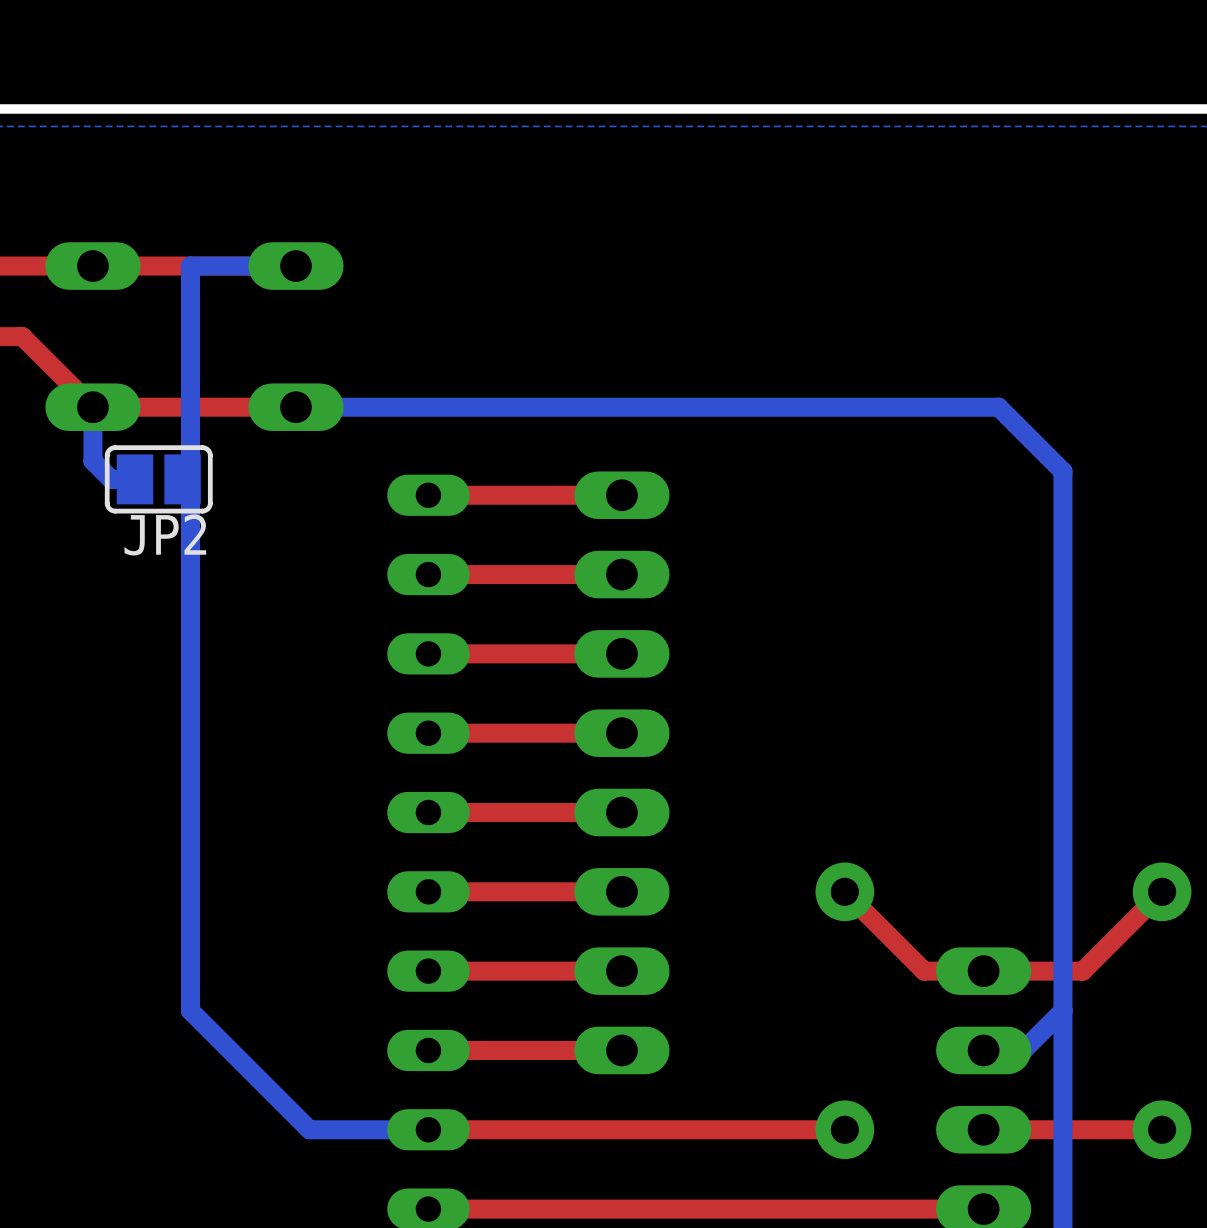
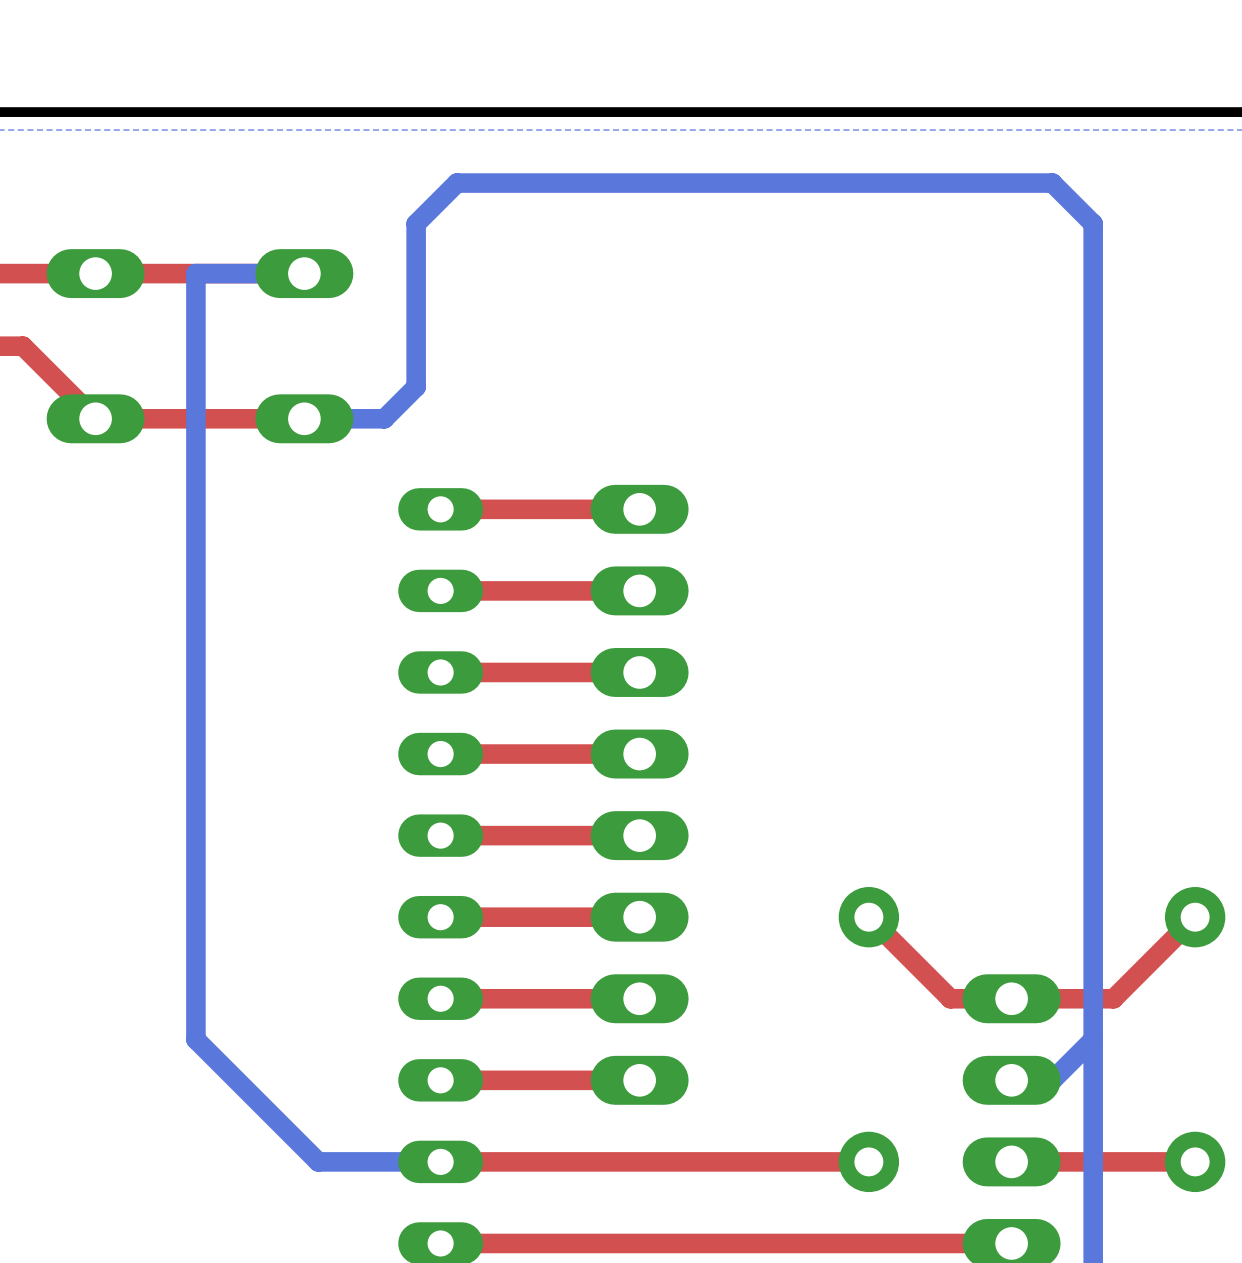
bottom track: (92, 407) (92, 461) (111, 479) (134, 479) -> none
bottom track: (373, 407) (998, 407) (1062, 471) -> (384, 418) (416, 386) (416, 223) (456, 183) (1052, 183) (1093, 223) (1093, 484)
JP2: (158, 479) -> none

